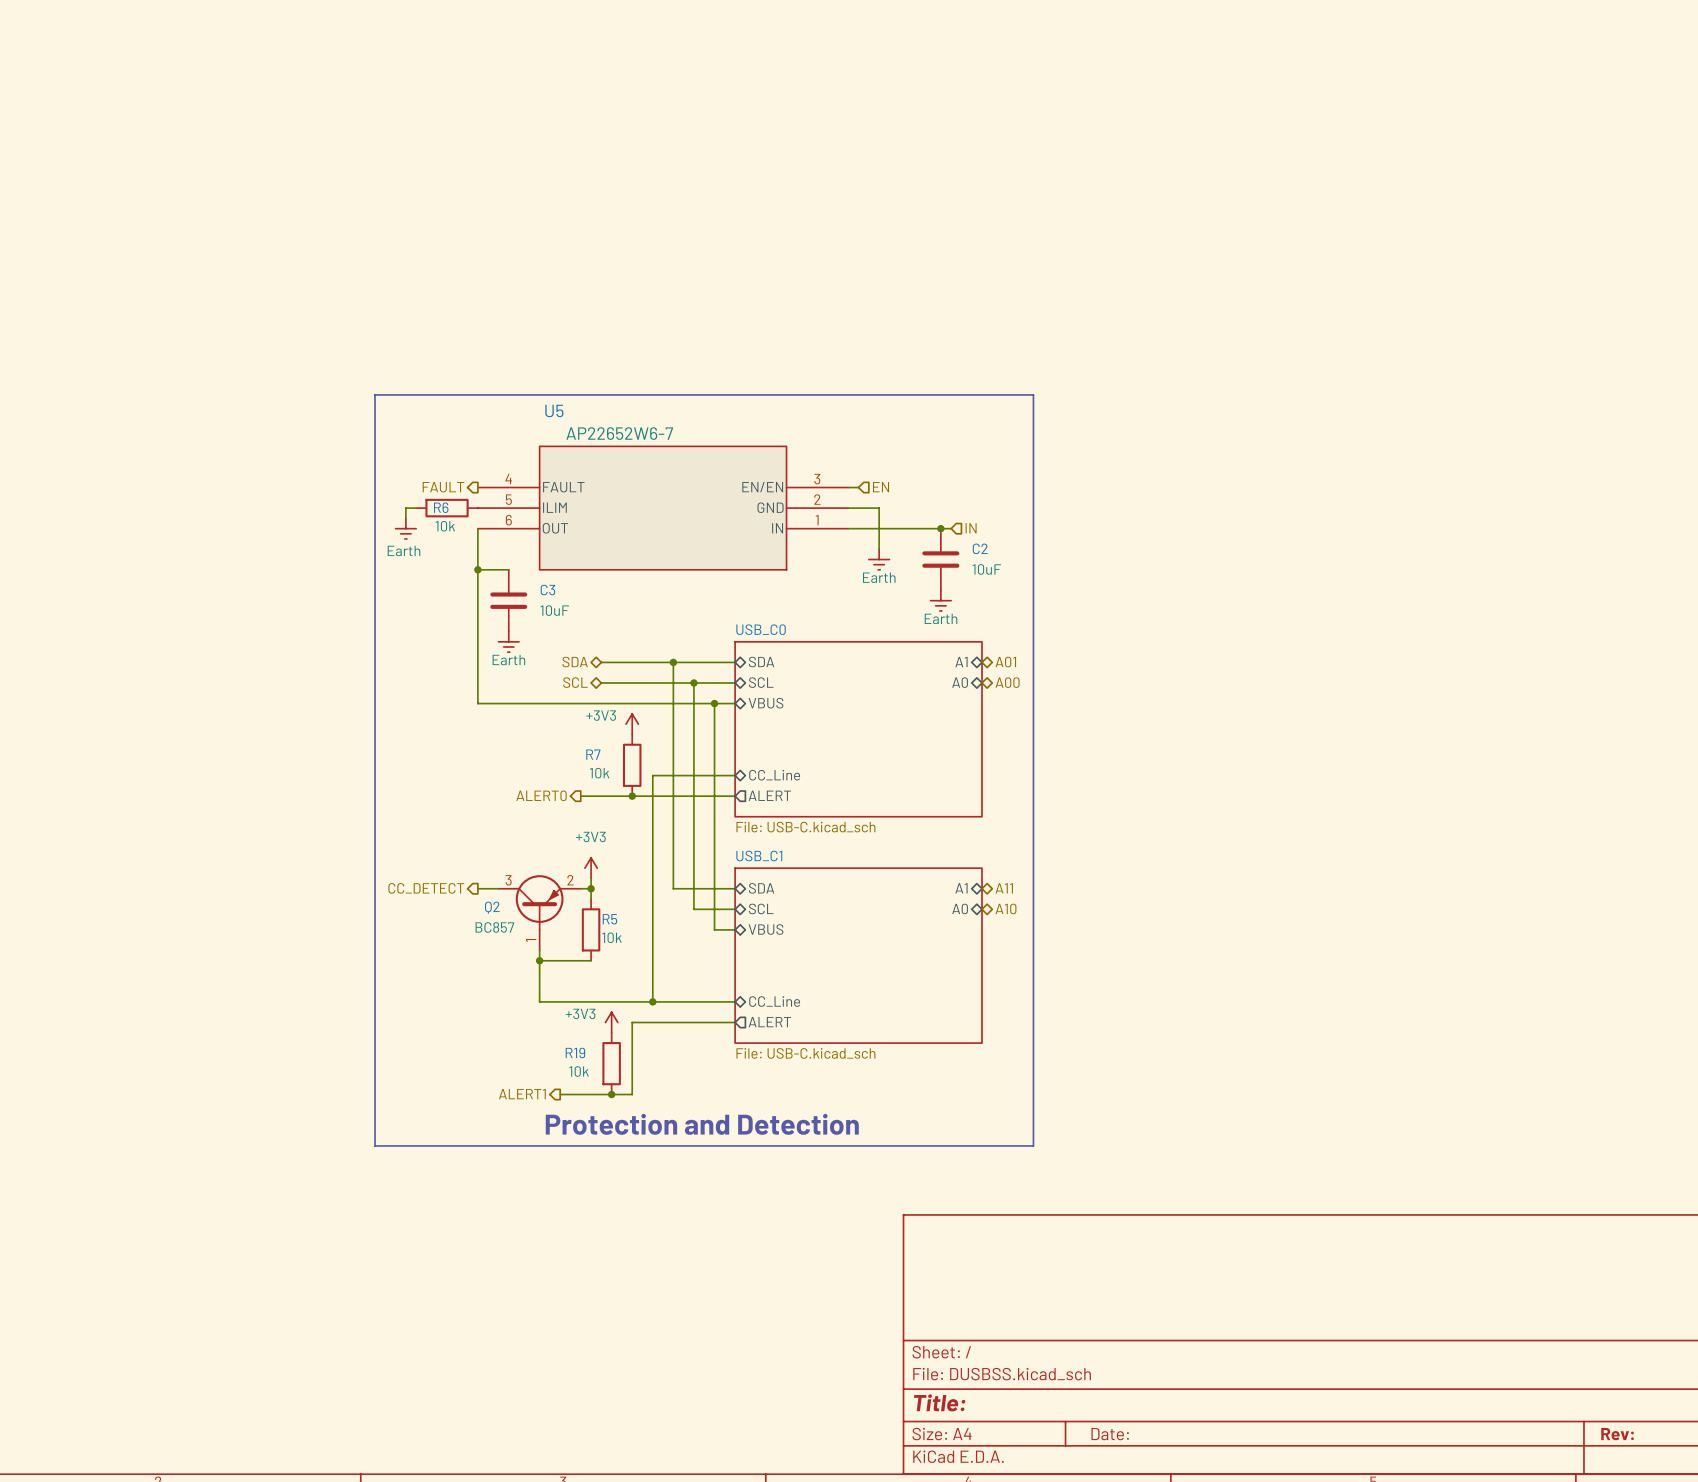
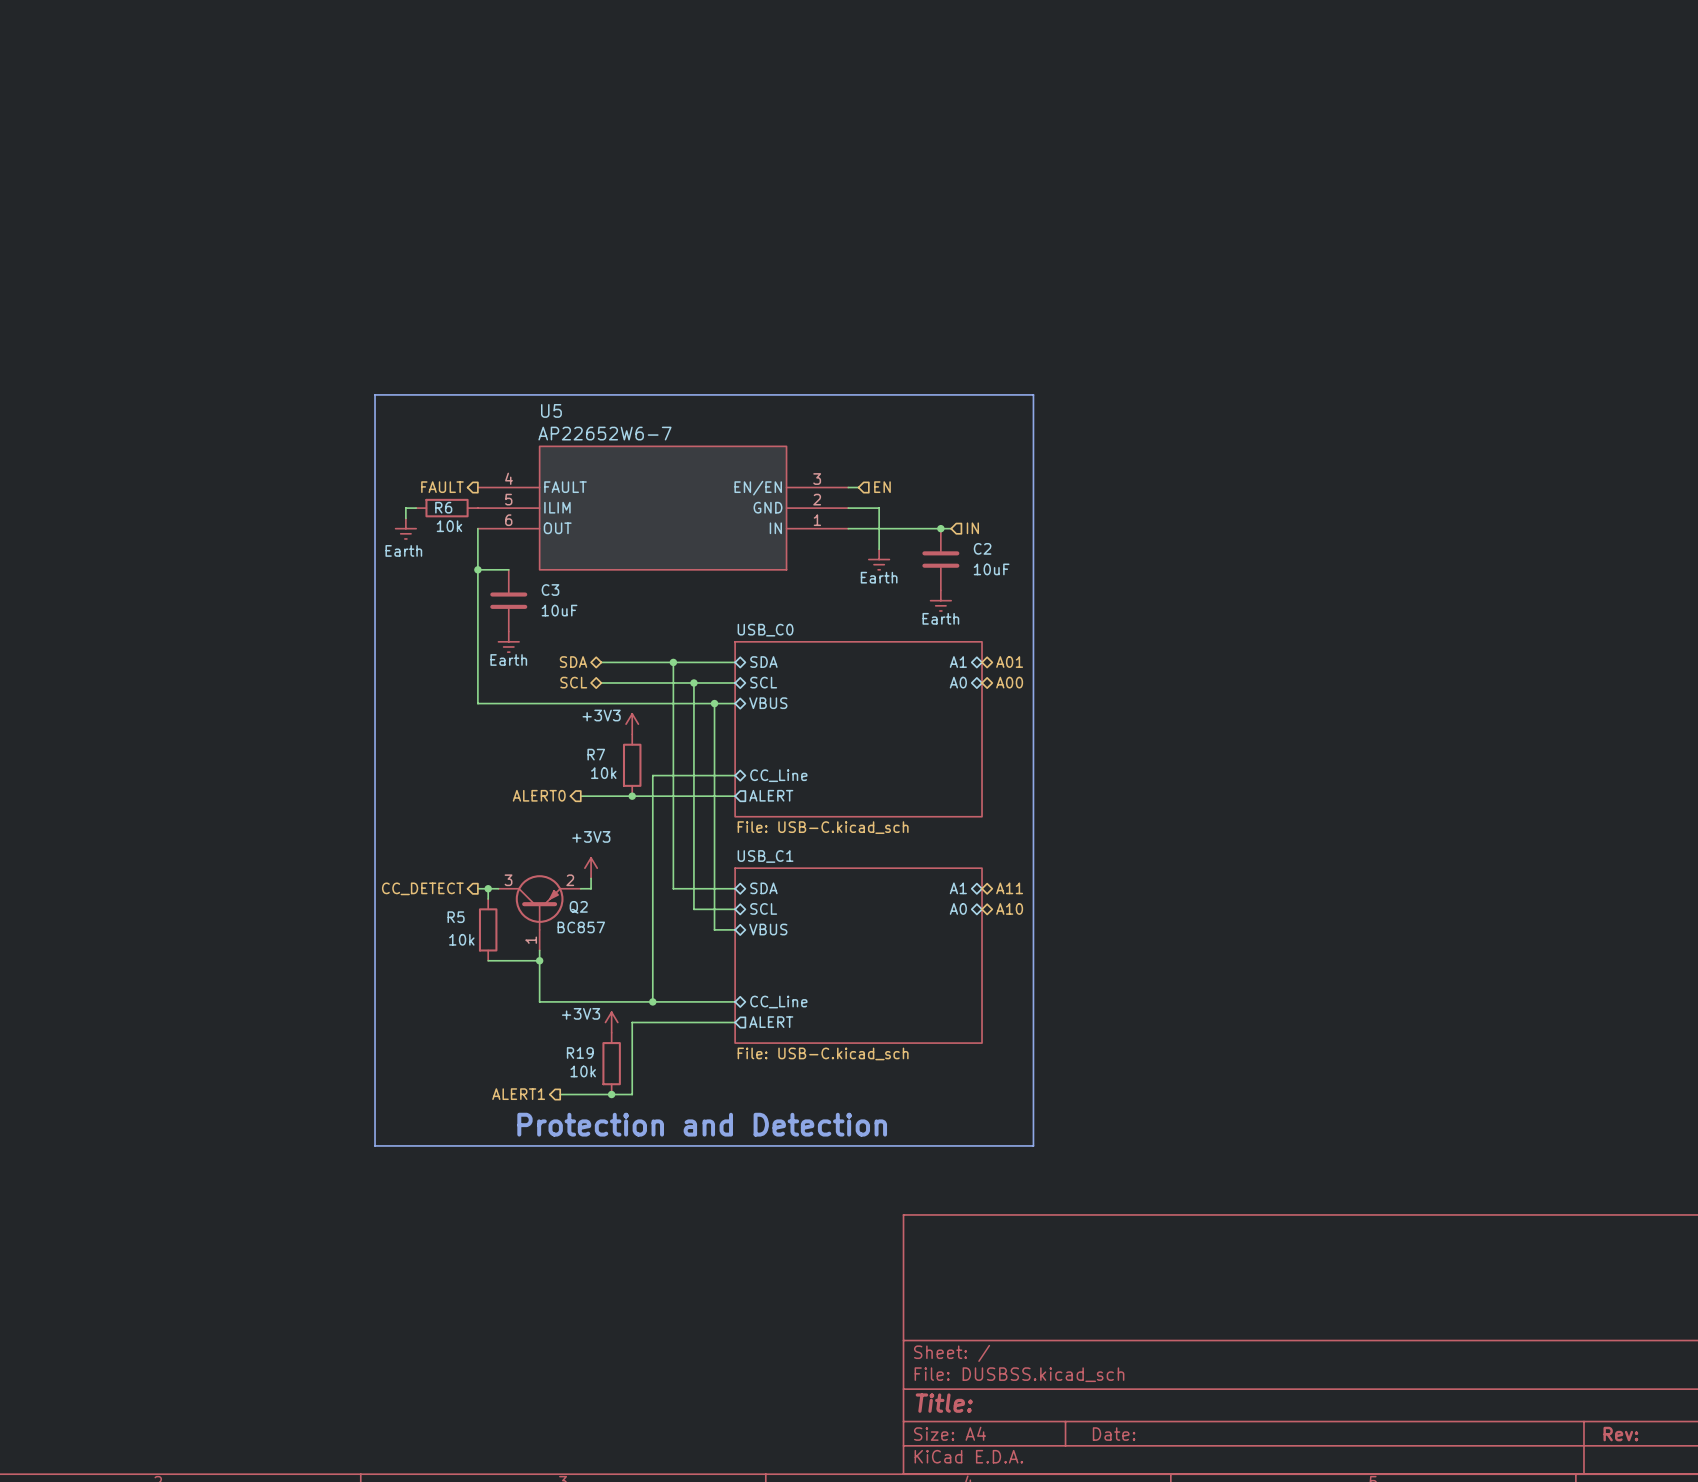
junction: none -> (488, 888)
wire: (591, 888) (591, 899) -> (488, 888) (488, 899)
junction: (591, 888) -> none
Q2 name position: Q2 (492, 907) -> Q2 (578, 907)
R5 name position: R5 (609, 919) -> R5 (456, 917)
Q2 value position: BC857 (494, 927) -> BC857 (581, 927)
R5 position: (591, 929) -> (488, 929)
R5 value position: 10k (611, 937) -> 10k (461, 939)
wire: (539, 960) (591, 960) -> (539, 960) (488, 960)

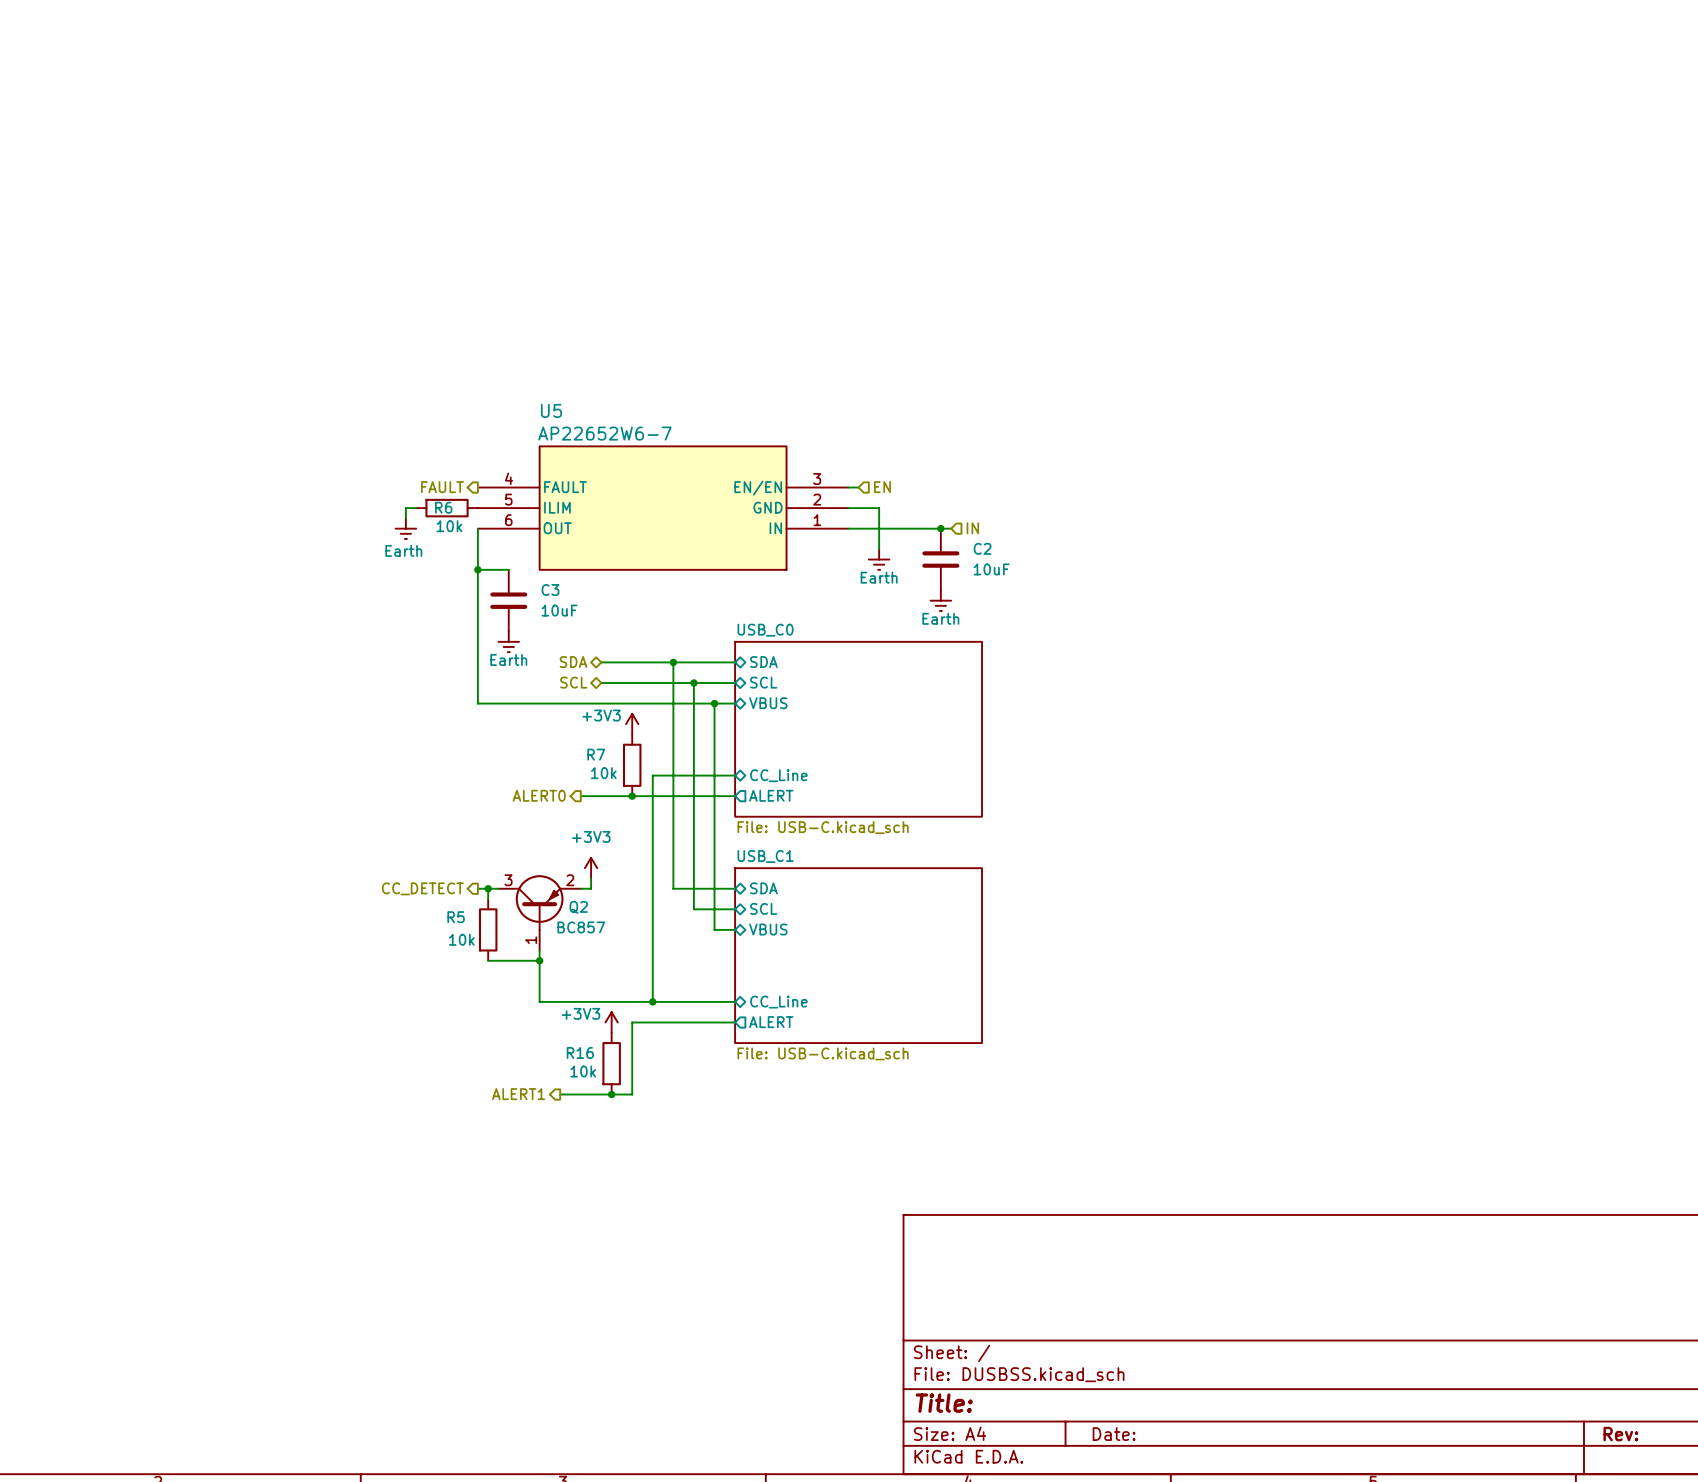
bus: (375, 394) (1033, 394) (1033, 1145) (375, 1145) (375, 394) -> none
sheet pin: A1 (958, 662) -> none
hierarchical label: A01 (1009, 662) -> none
sheet pin: A0 (958, 682) -> none
hierarchical label: A00 (1009, 682) -> none
sheet pin: A1 (958, 888) -> none
hierarchical label: A11 (1009, 888) -> none
sheet pin: A0 (958, 908) -> none
hierarchical label: A10 (1009, 908) -> none
R19 name: R19 (580, 1052) -> R16 (580, 1052)
text: Protection and Detection (702, 1124) -> none

